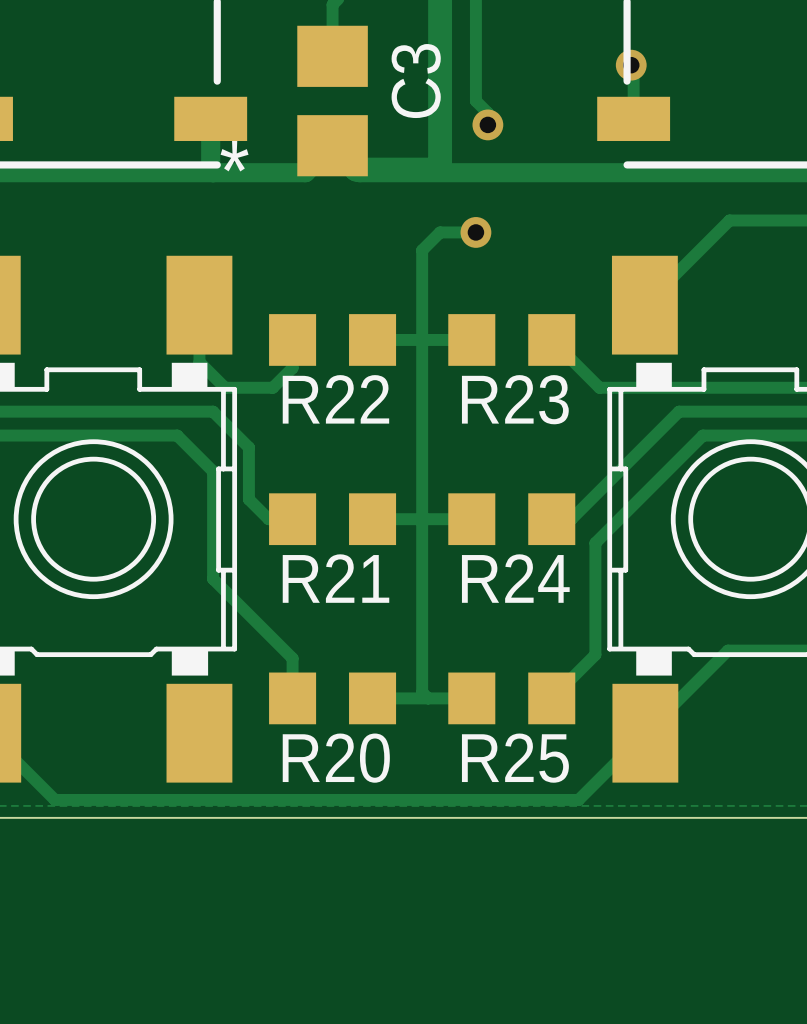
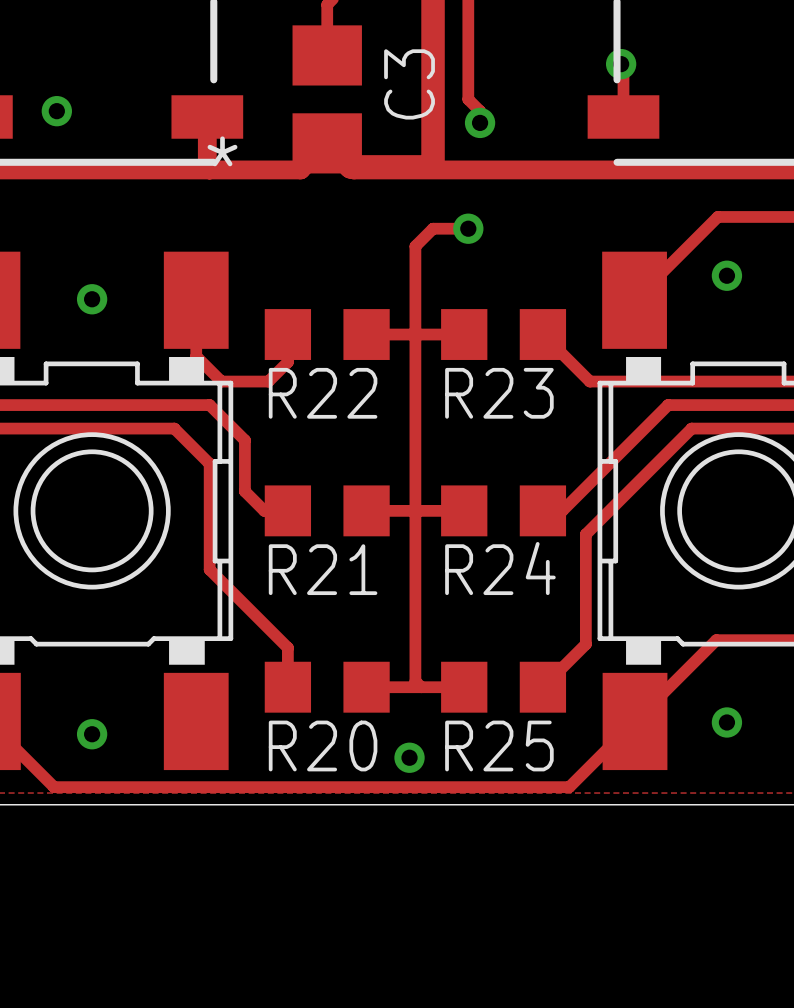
via: none -> (56, 111)
via: none -> (726, 275)
via: none -> (92, 299)
via: none -> (726, 722)
via: none -> (92, 734)
via: none -> (409, 757)

